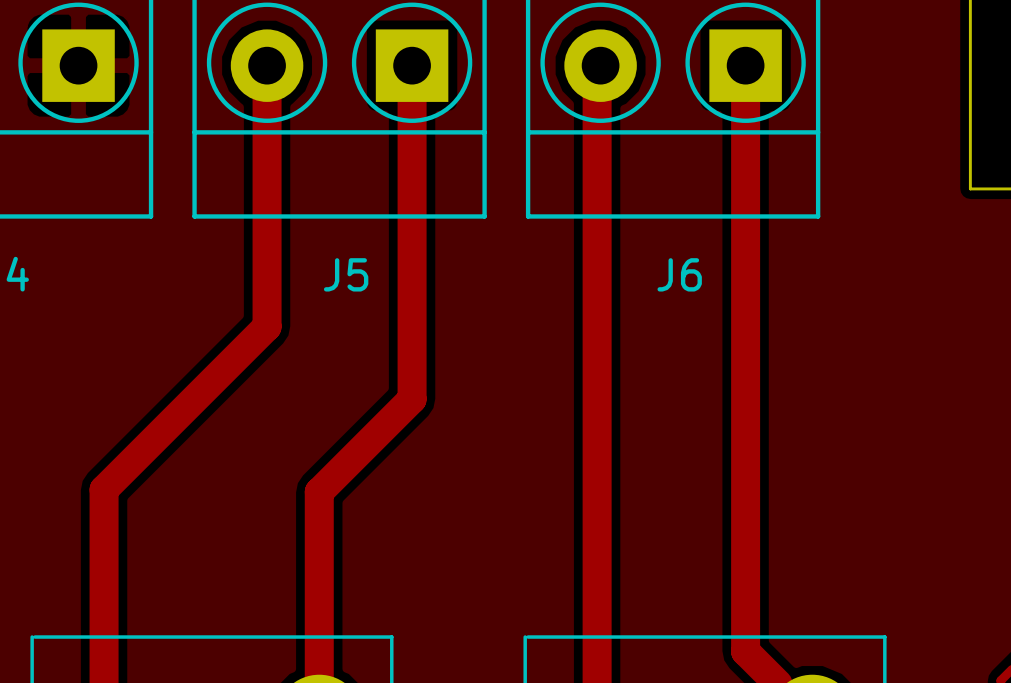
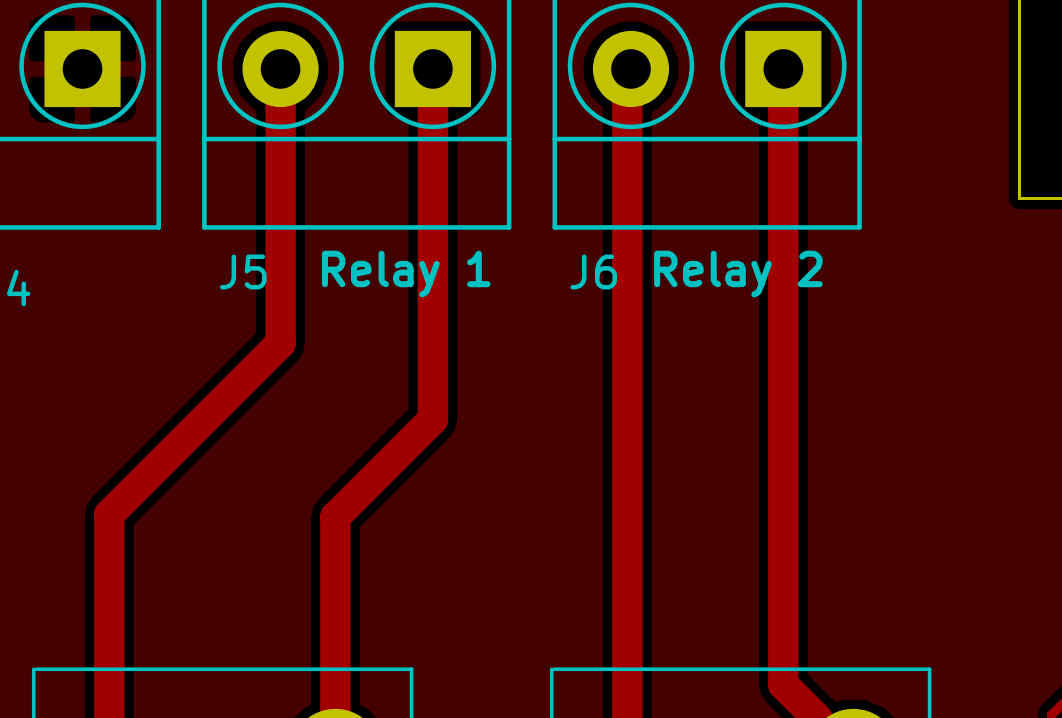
text: none -> Relay 1 (406, 274)
text: none -> Relay 2 (738, 274)
J5 name position: J5 (346, 274) -> J5 (243, 272)
J6 name position: J6 (679, 274) -> J6 (593, 272)

